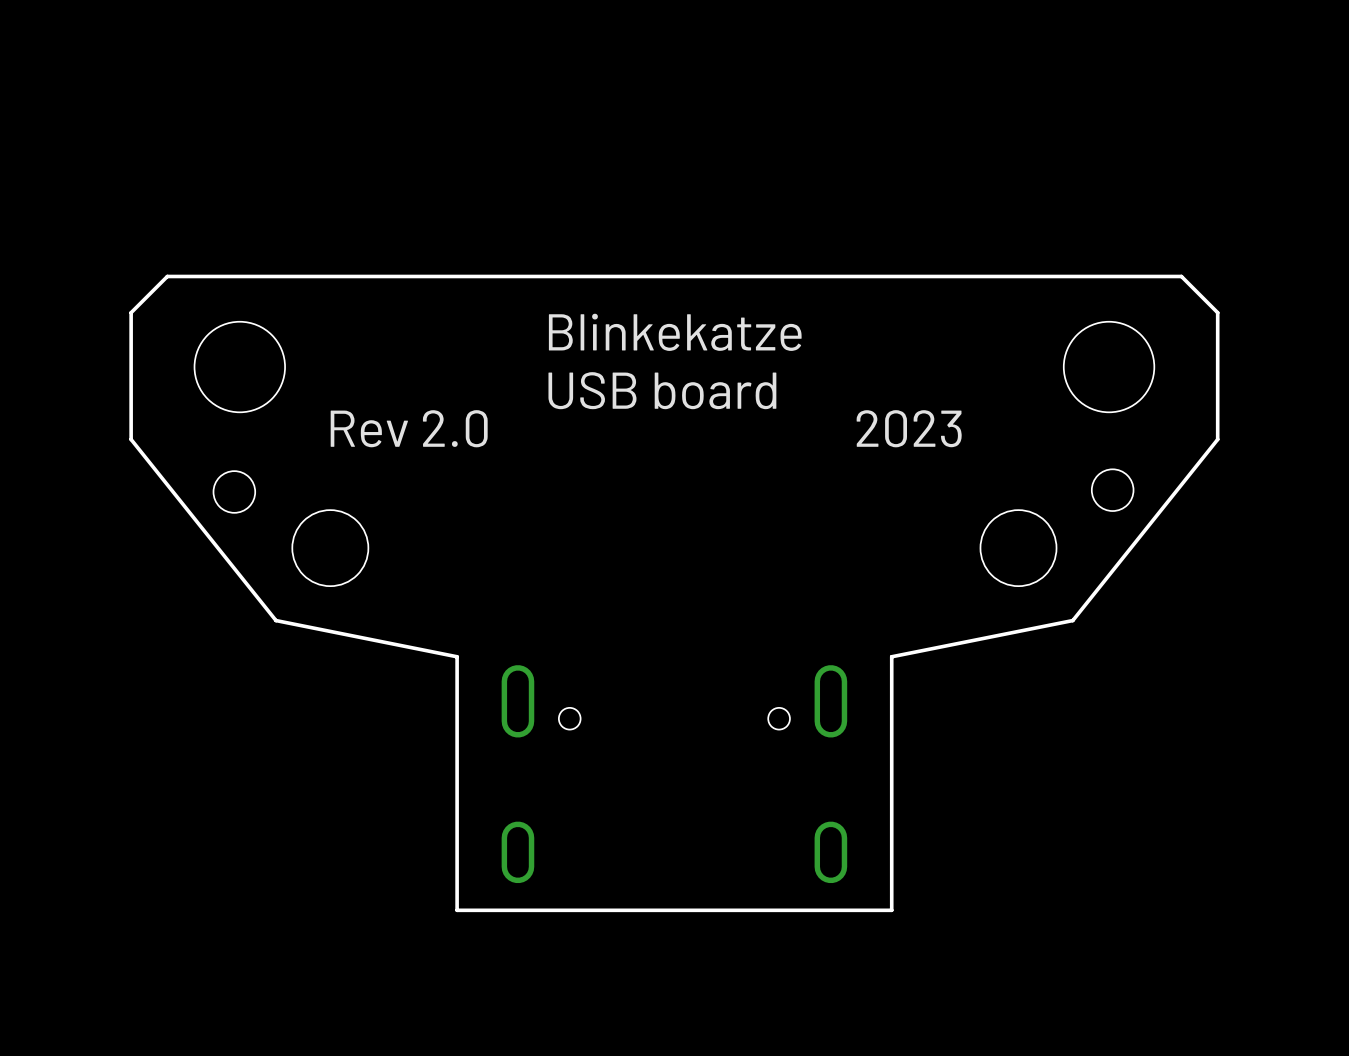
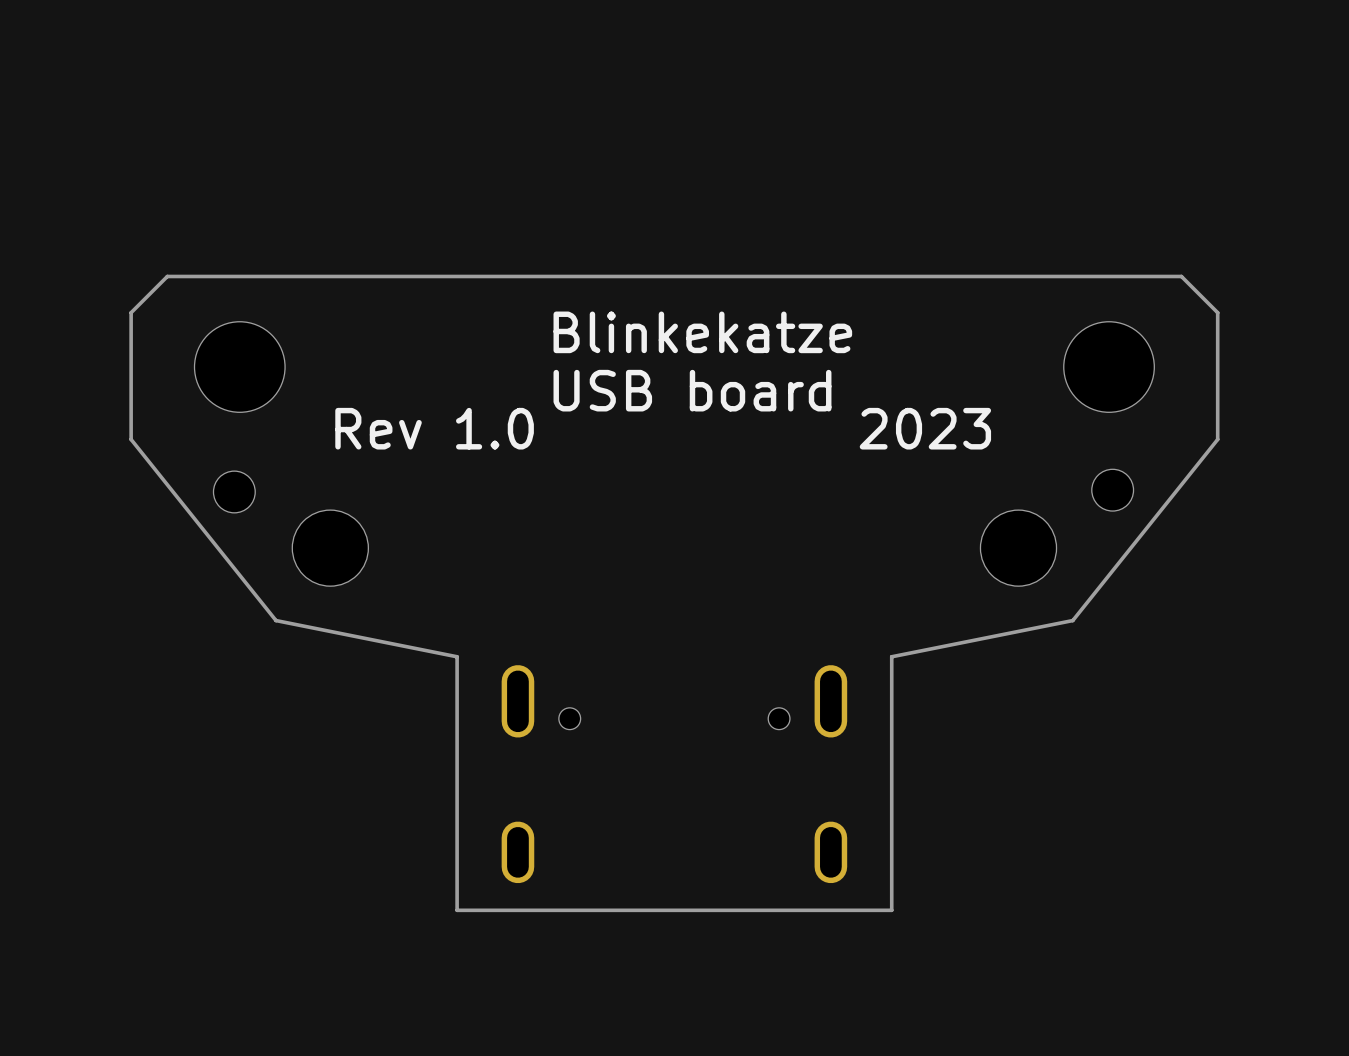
text: Rev 2.0 (409, 428) -> Rev 1.0 (434, 428)

